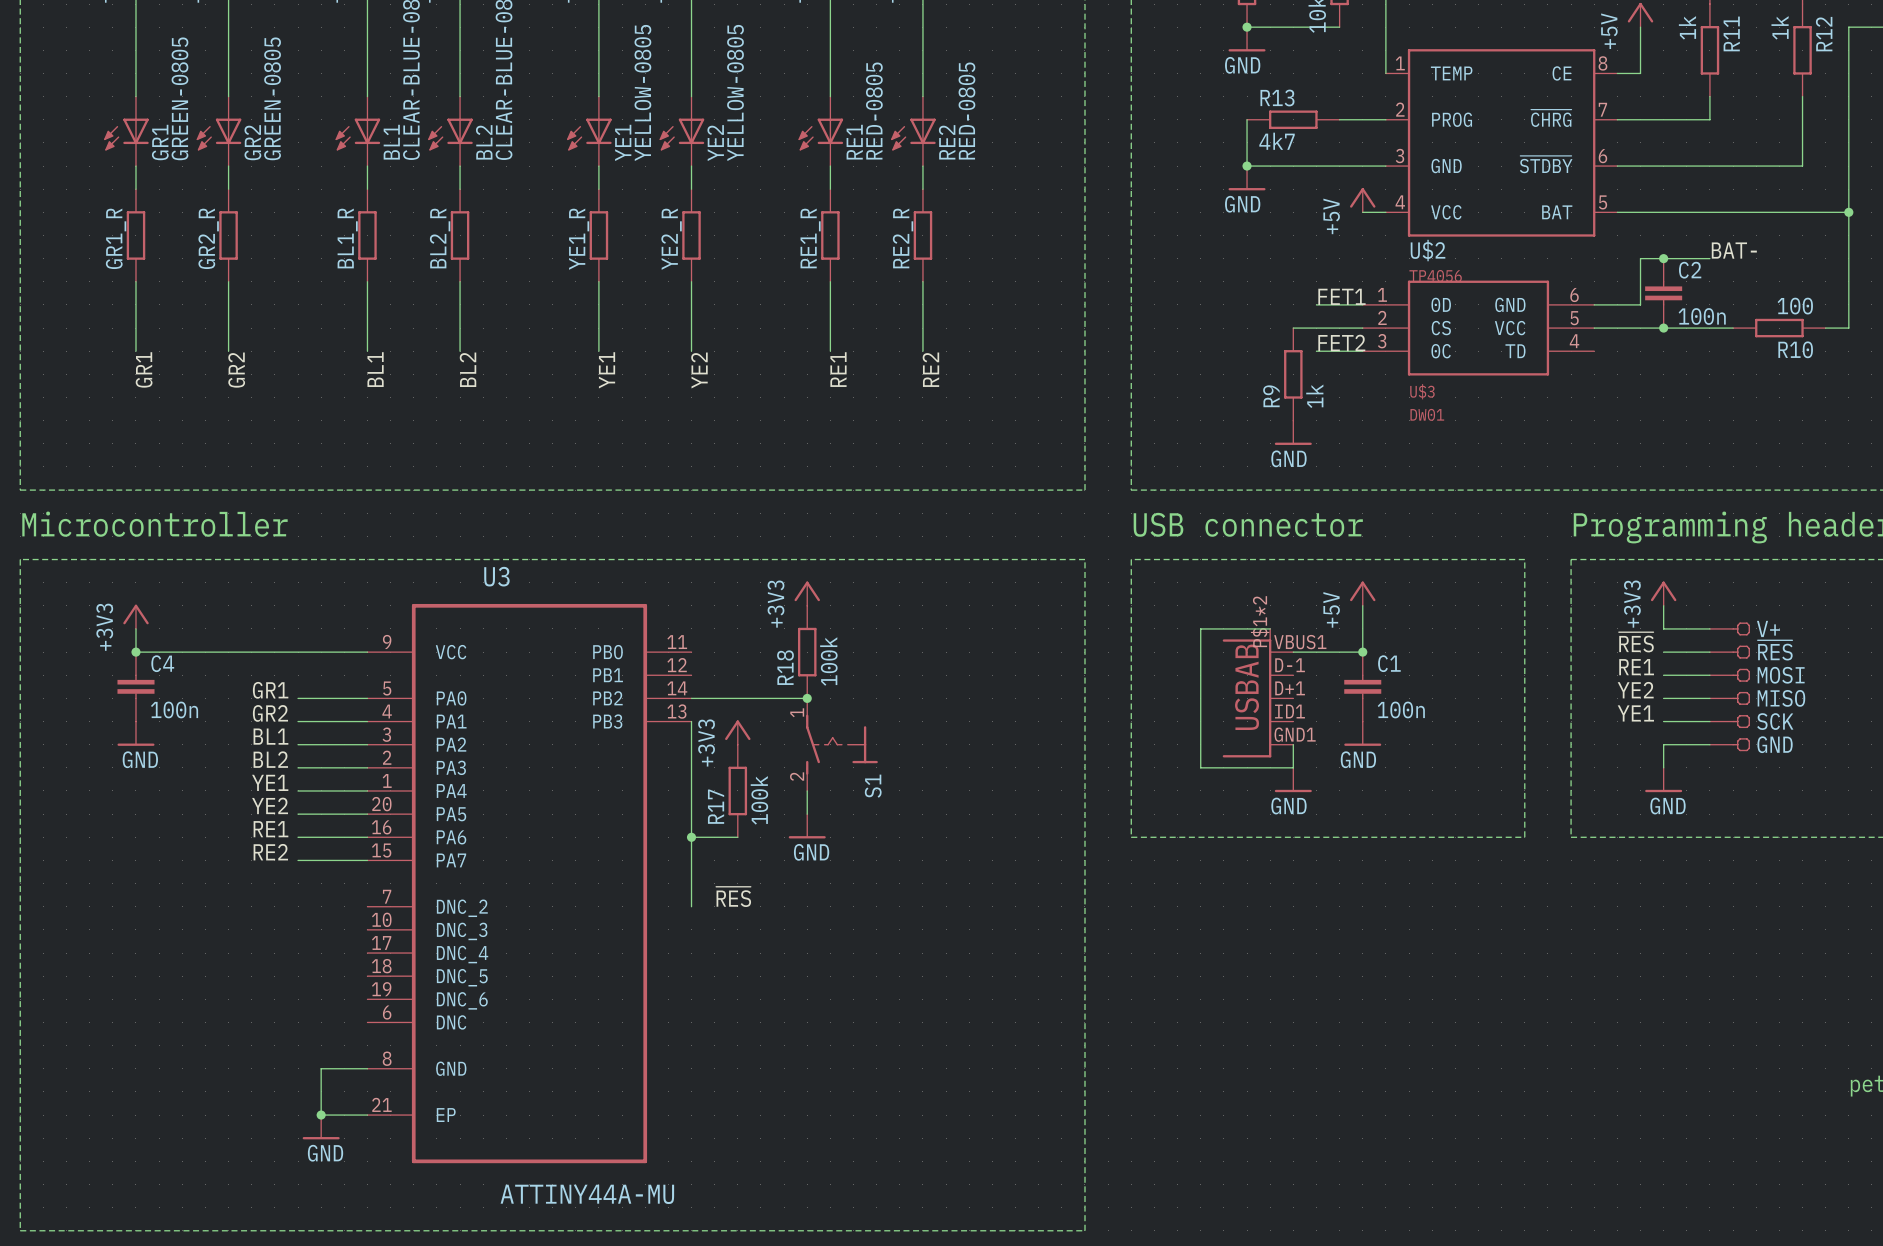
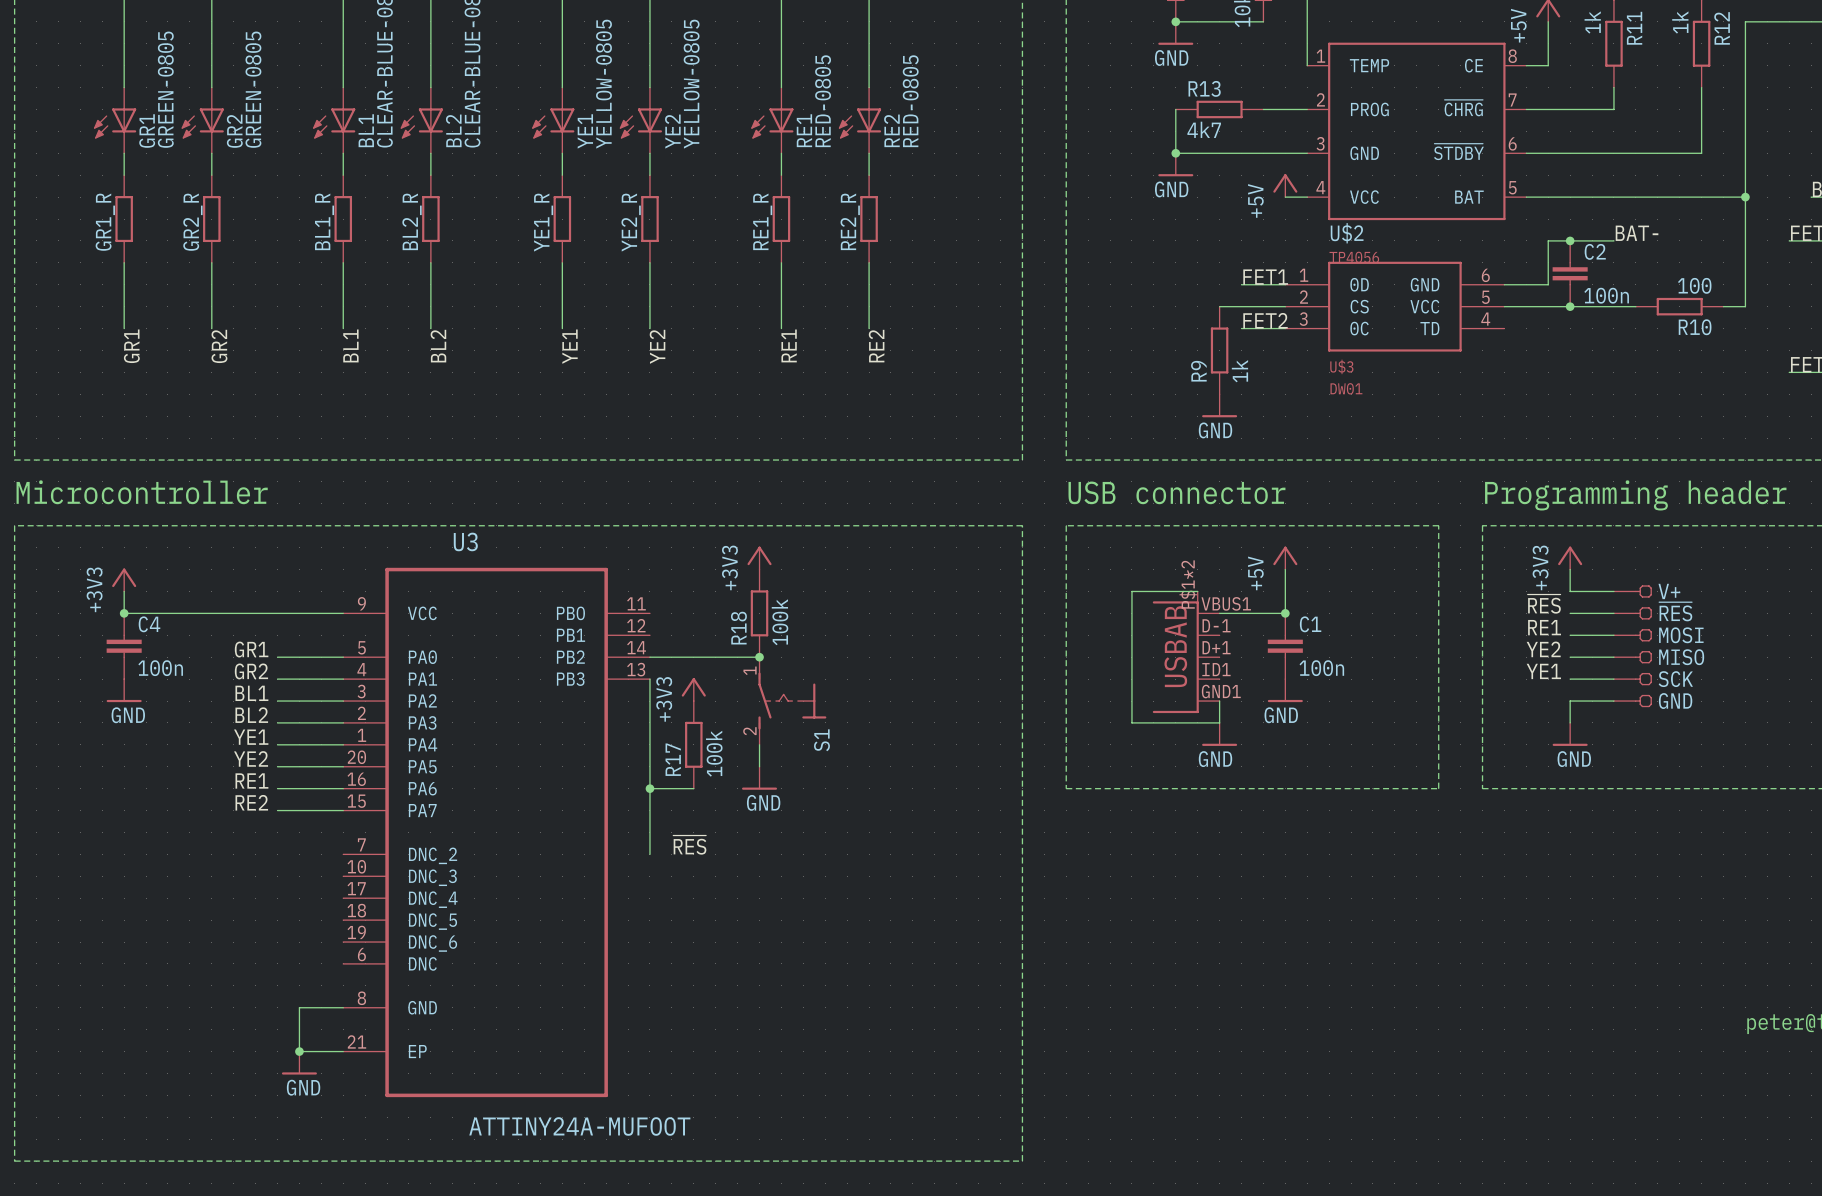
U3 value: ATTINY44A-MU (587, 1194) -> ATTINY24A-MUFOOT (579, 1126)

